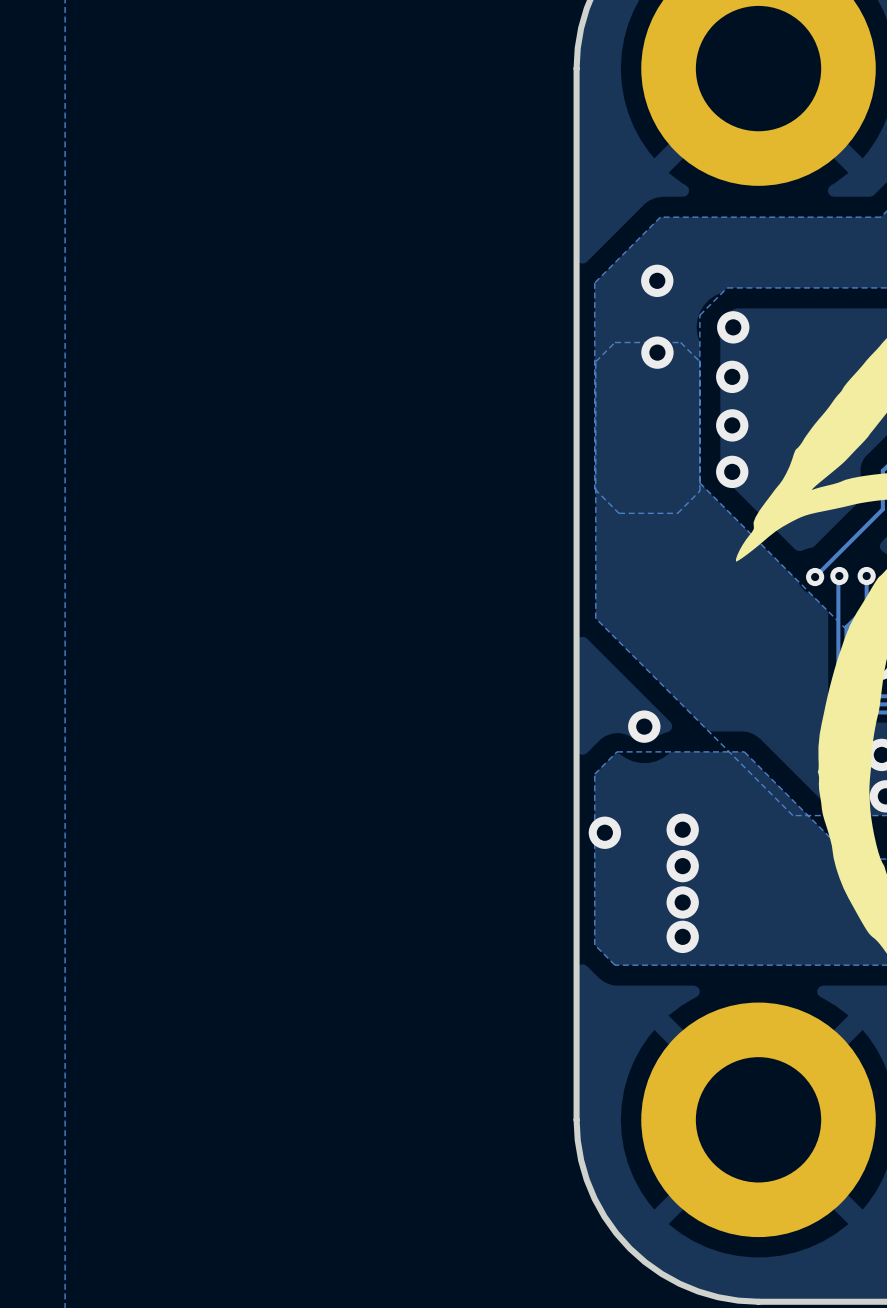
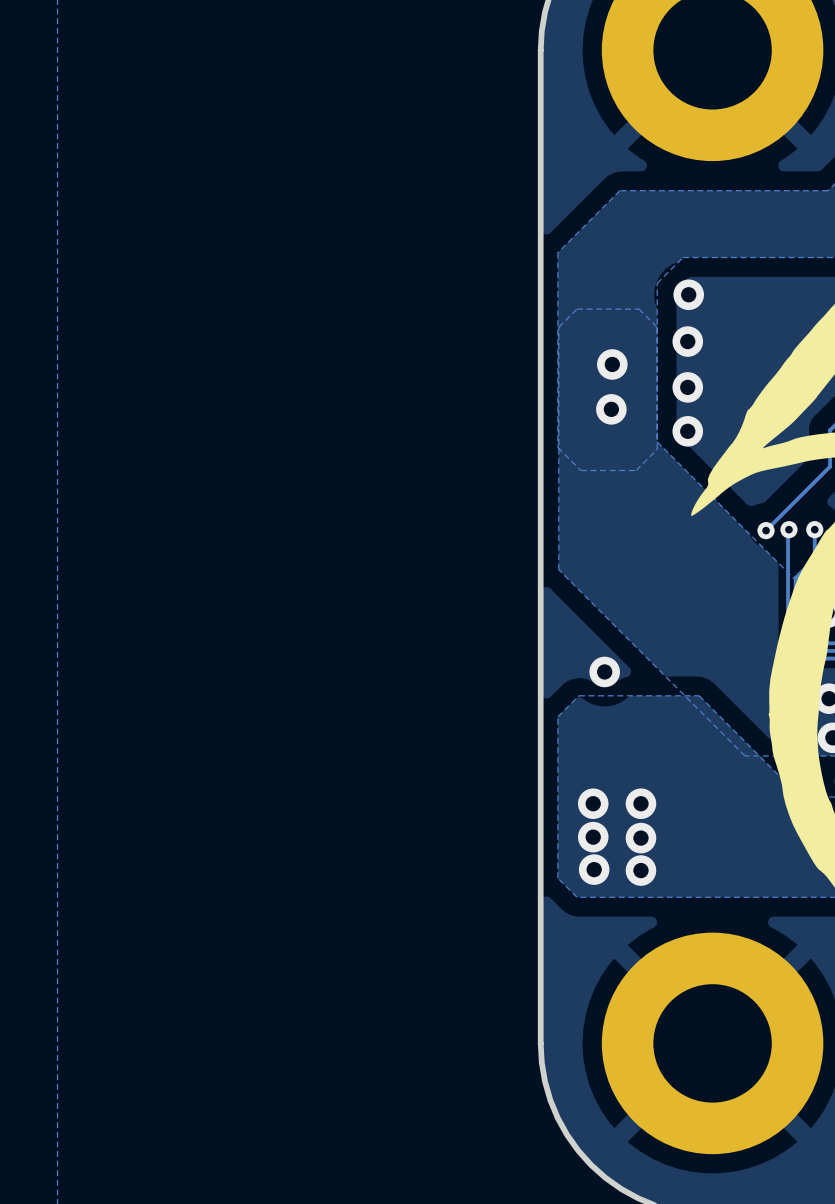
via: (657, 280) -> none
via: (657, 352) -> none
via: none -> (612, 364)
via: none -> (611, 409)
via: (682, 829) -> none
via: (604, 832) -> none
via: none -> (593, 803)
via: none -> (593, 837)
via: none -> (594, 869)

